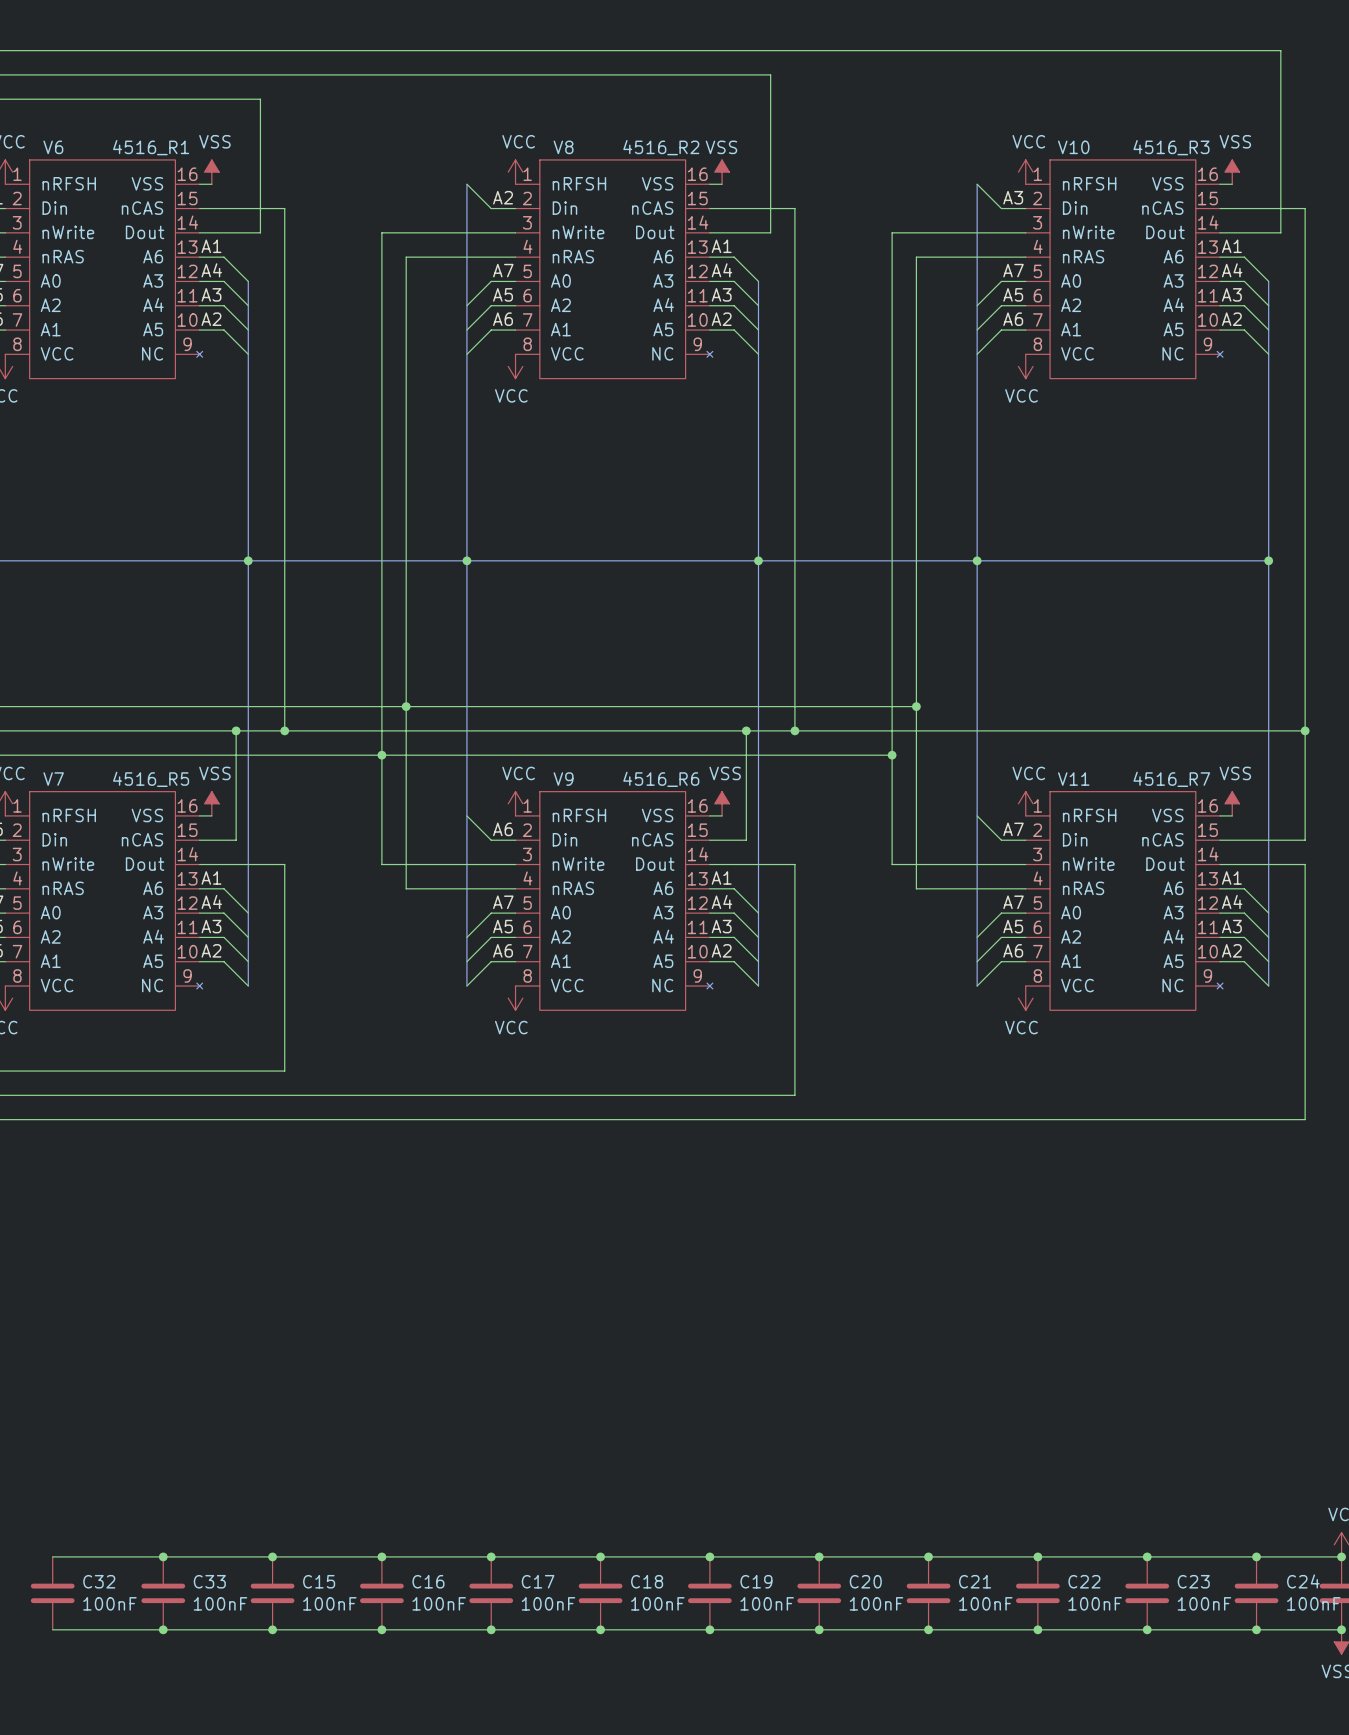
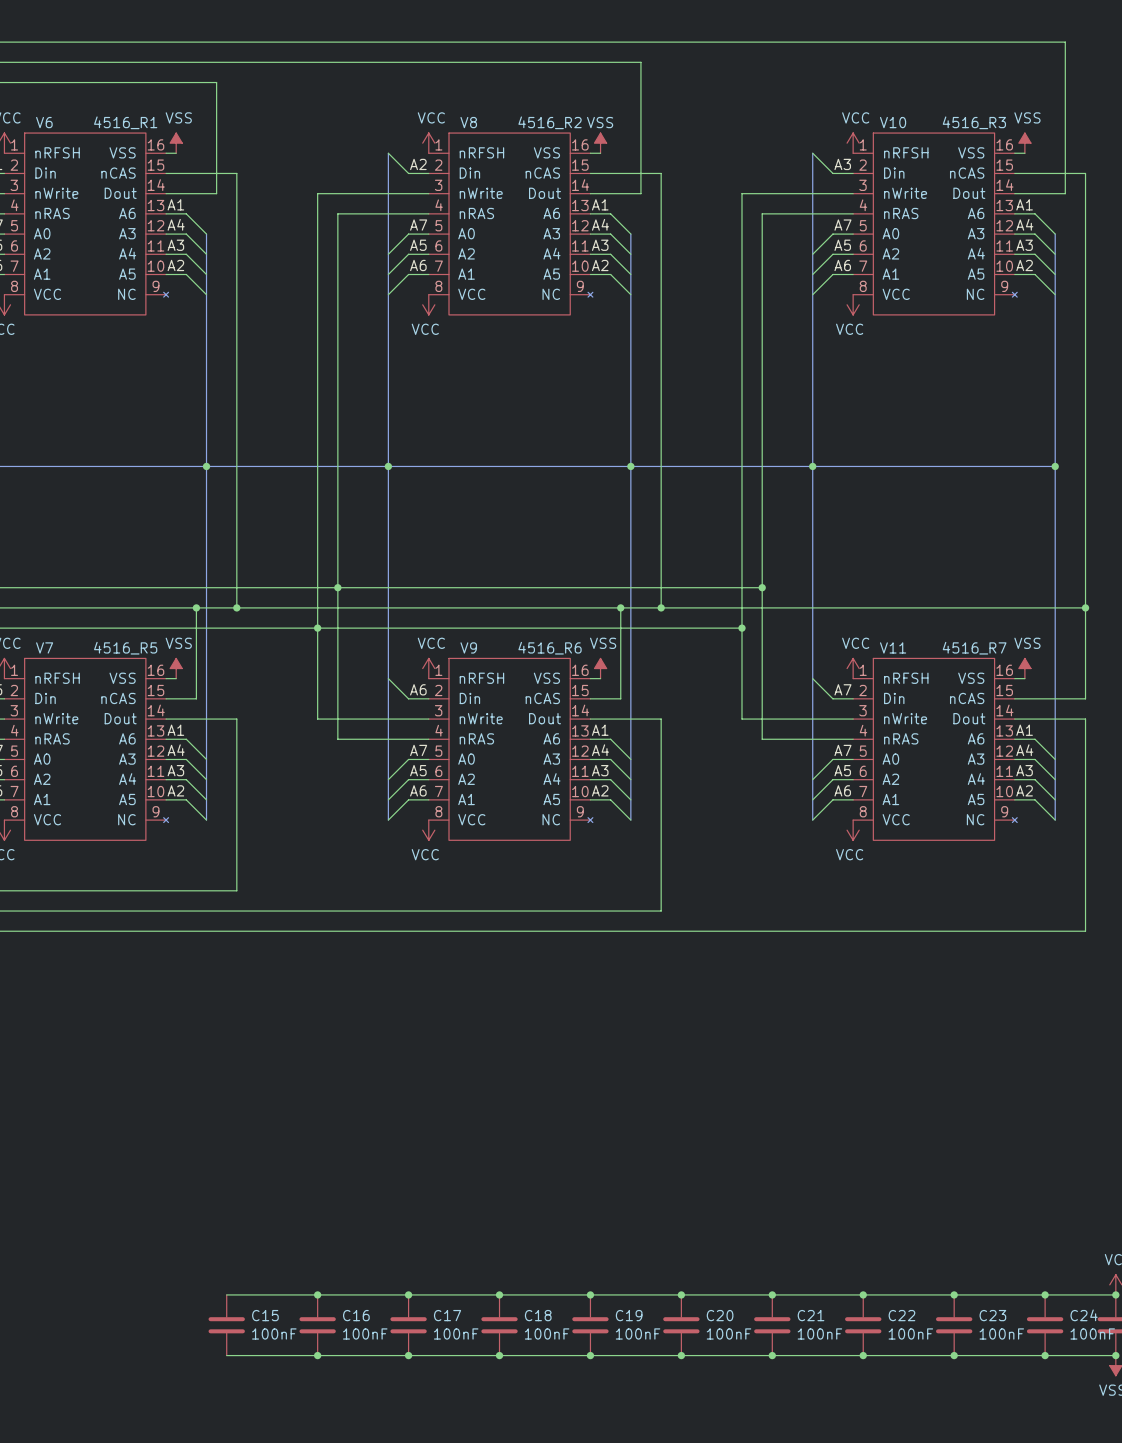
wire: (52, 1556) (272, 1556) -> none
junction: (163, 1556) -> none
junction: (272, 1556) -> none
C32: 100nF (52, 1593) -> none
C33: 100nF (163, 1593) -> none
wire: (52, 1629) (272, 1629) -> none
junction: (163, 1629) -> none
junction: (272, 1629) -> none

